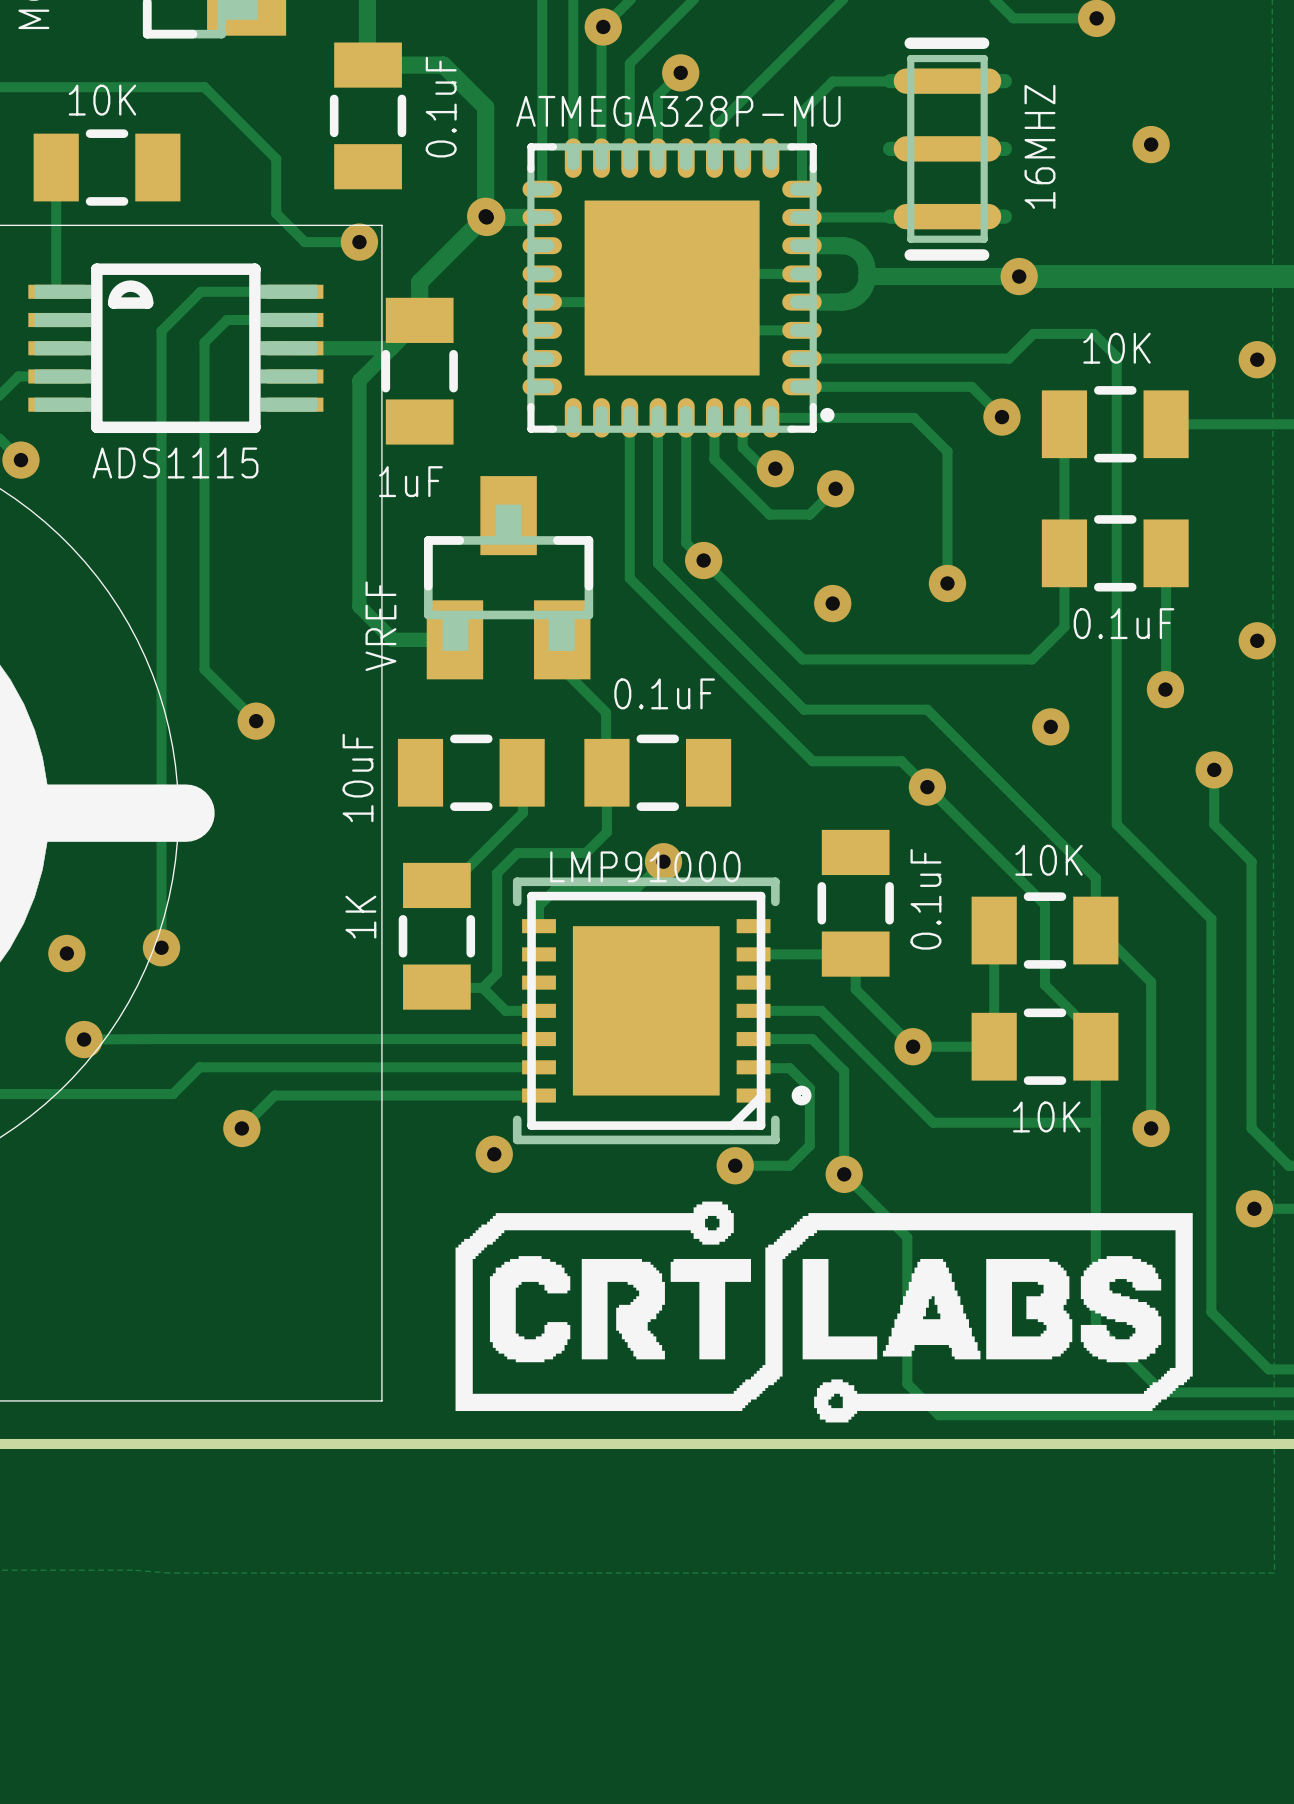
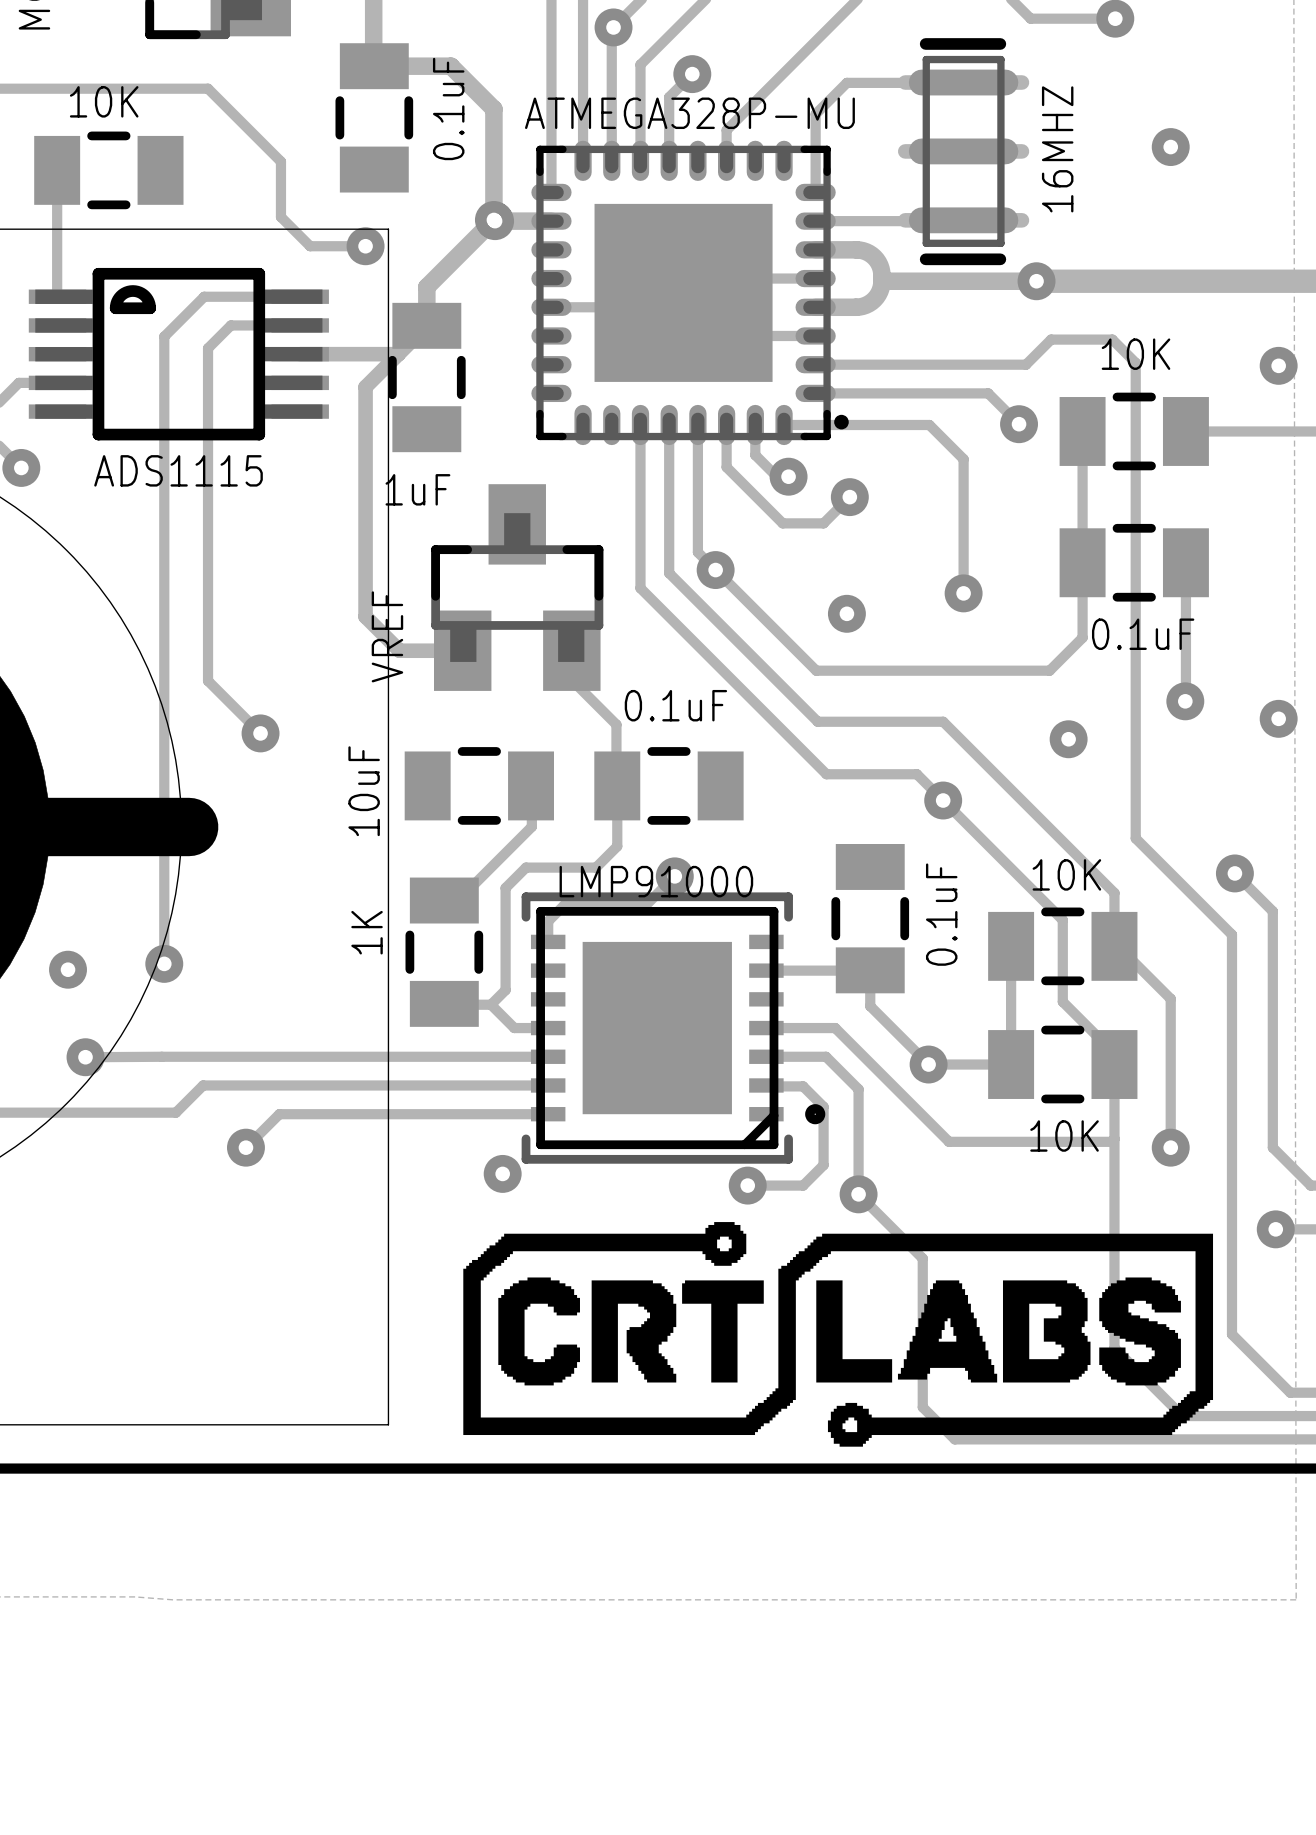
via: (1257, 640) -> none
via: none -> (1278, 718)
track: (1214, 769) (1214, 824) (1251, 861) (1251, 896) -> (1234, 873) (1272, 911)
via: (1214, 769) -> none
via: none -> (1234, 873)

